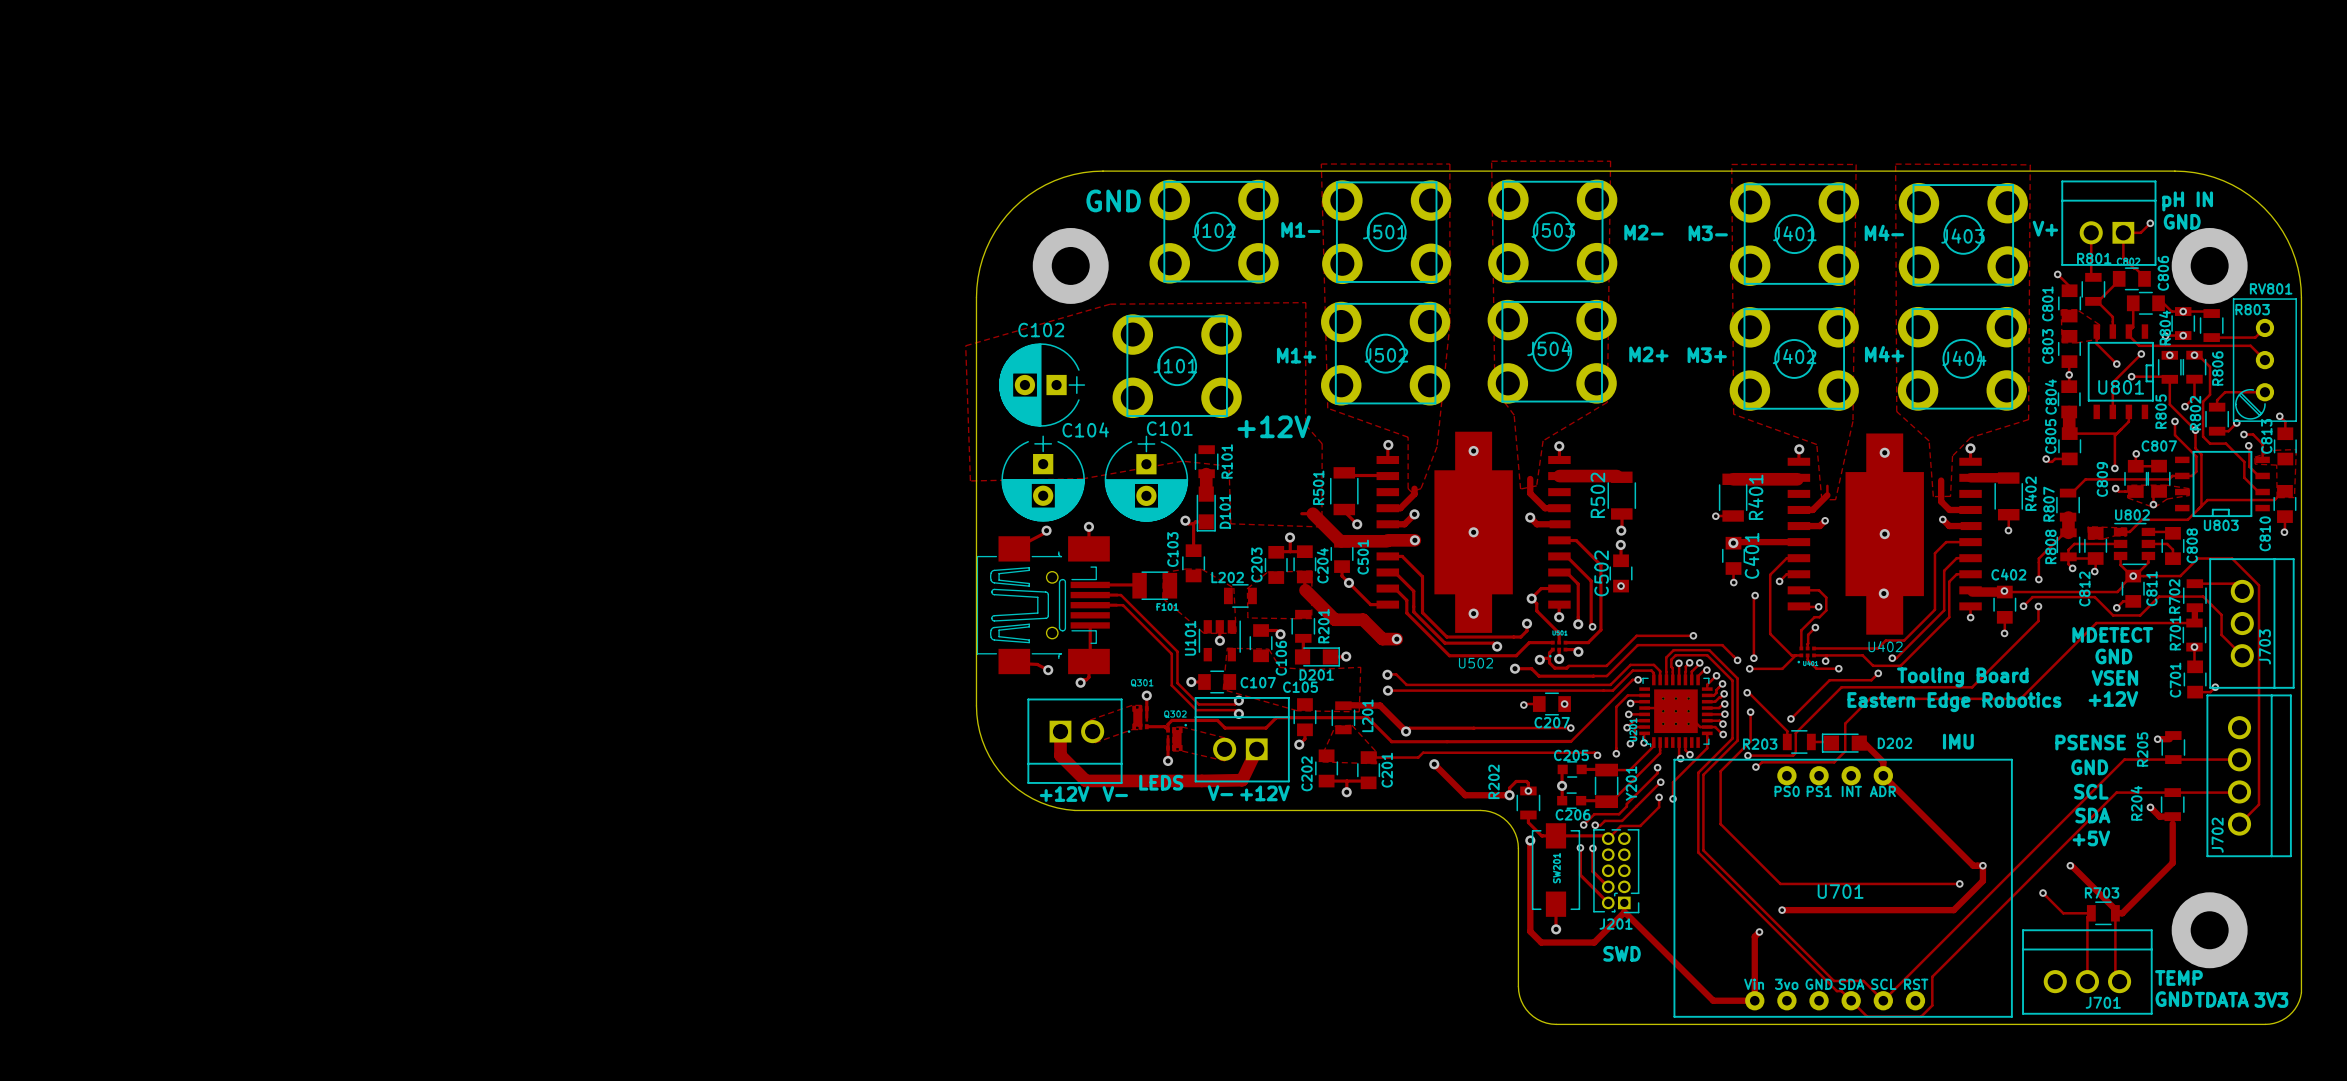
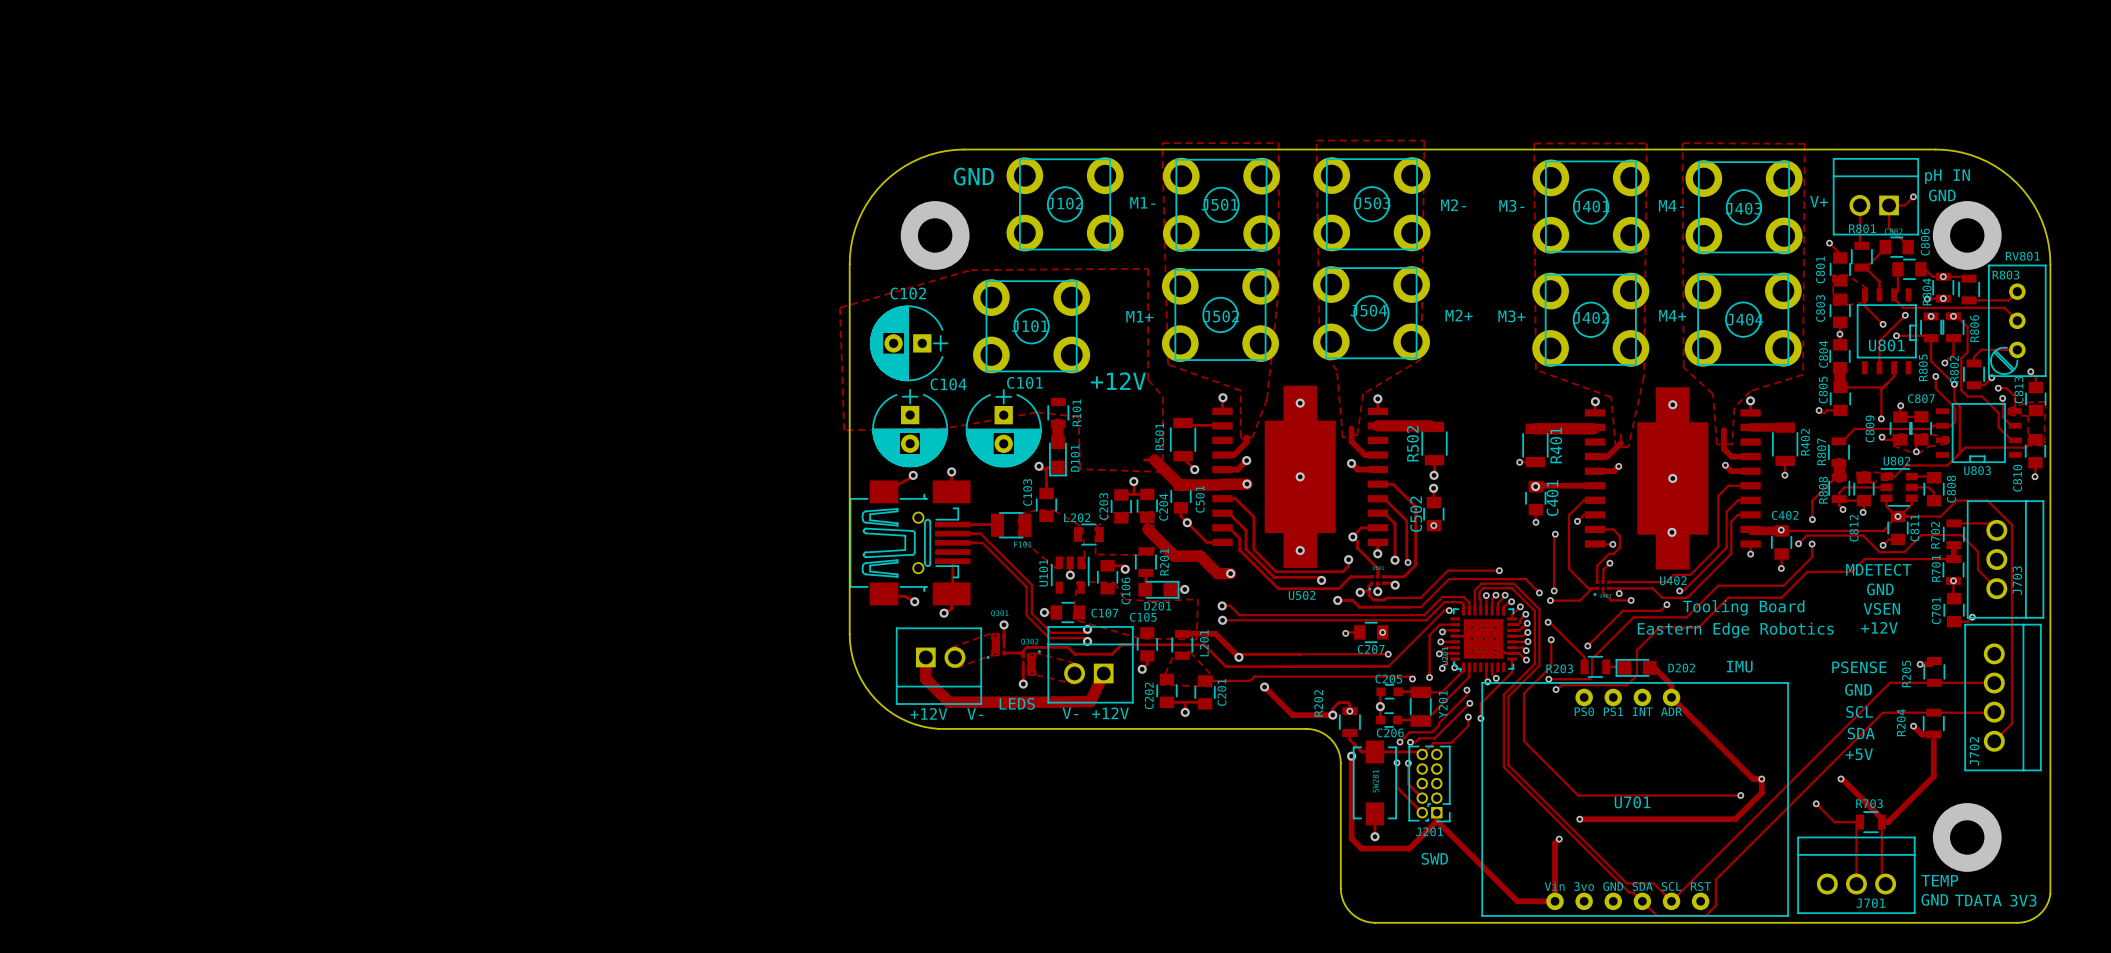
track: (2082, 637) (2020, 698) (1912, 698) -> (1851, 571) (1807, 571) (1781, 597) (1728, 597) (1698, 627)
track: (2007, 652) (1972, 687) (1899, 687) -> (1783, 585) (1718, 585) (1686, 617)

